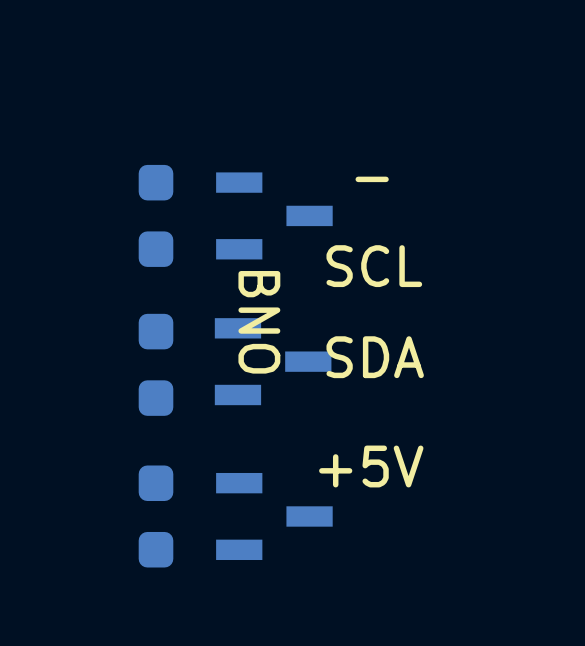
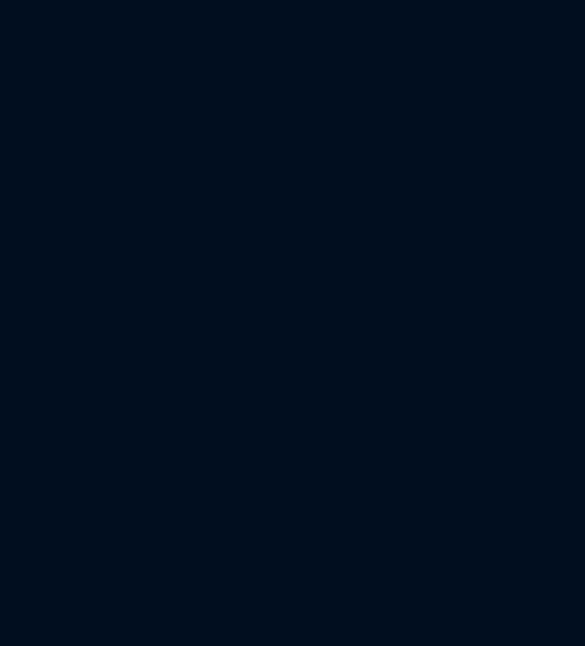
text: - (372, 179) -> none
part: (155, 215) -> none
part: (274, 215) -> none
text: SCL (374, 266) -> none
text: BNO (259, 322) -> none
text: SDA (375, 357) -> none
part: (273, 361) -> none
part: (155, 364) -> none
text: +5V (371, 466) -> none
part: (155, 516) -> none
part: (274, 516) -> none

